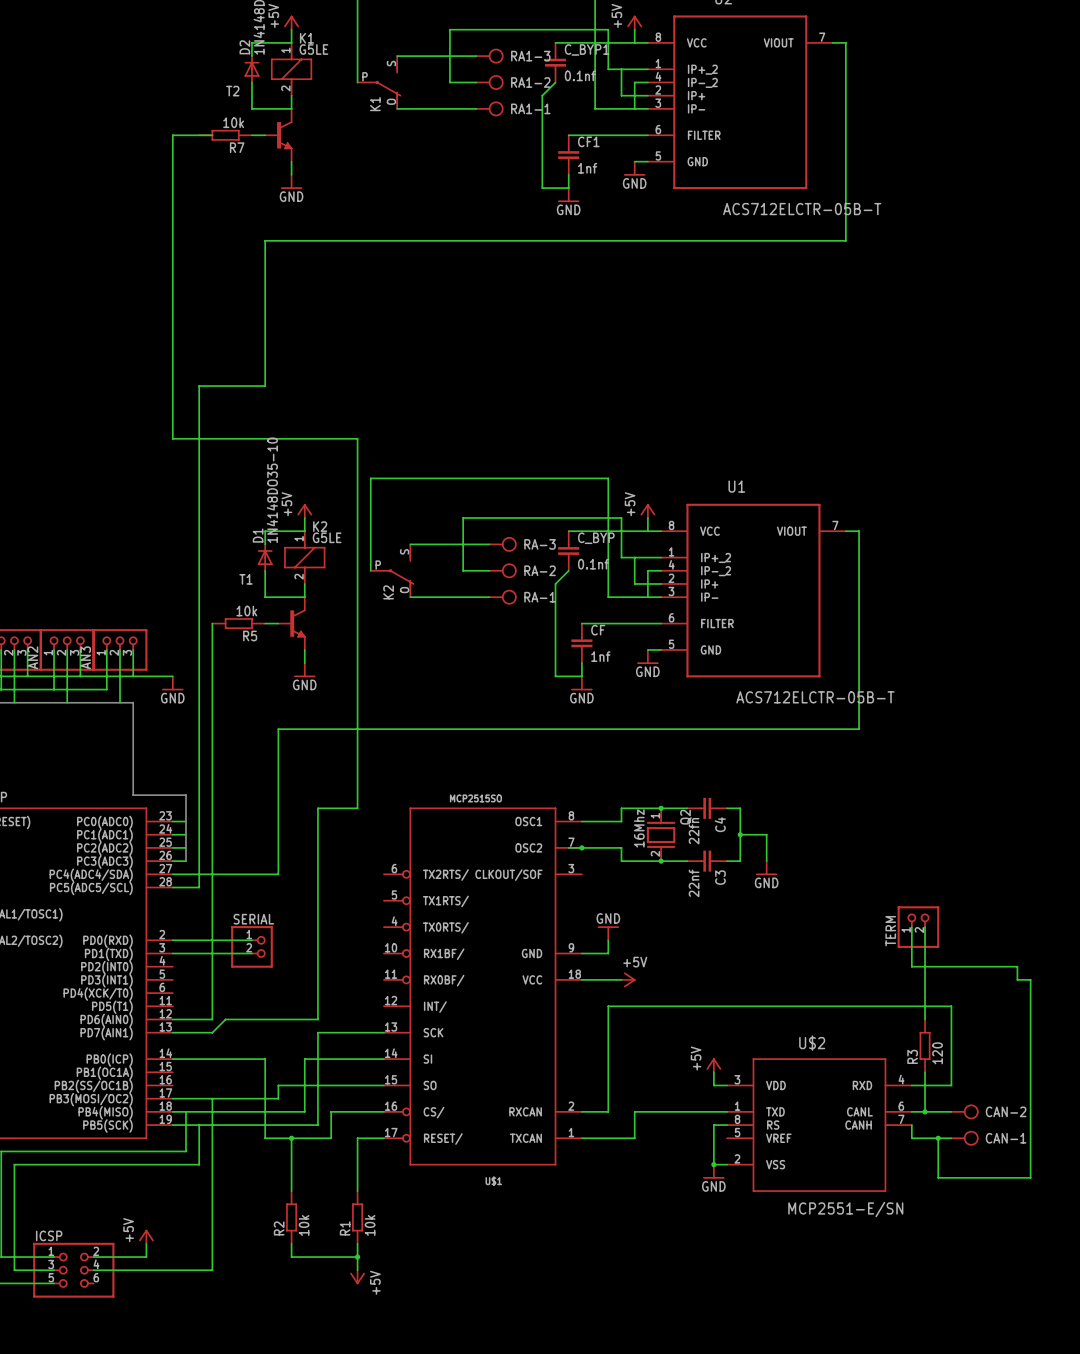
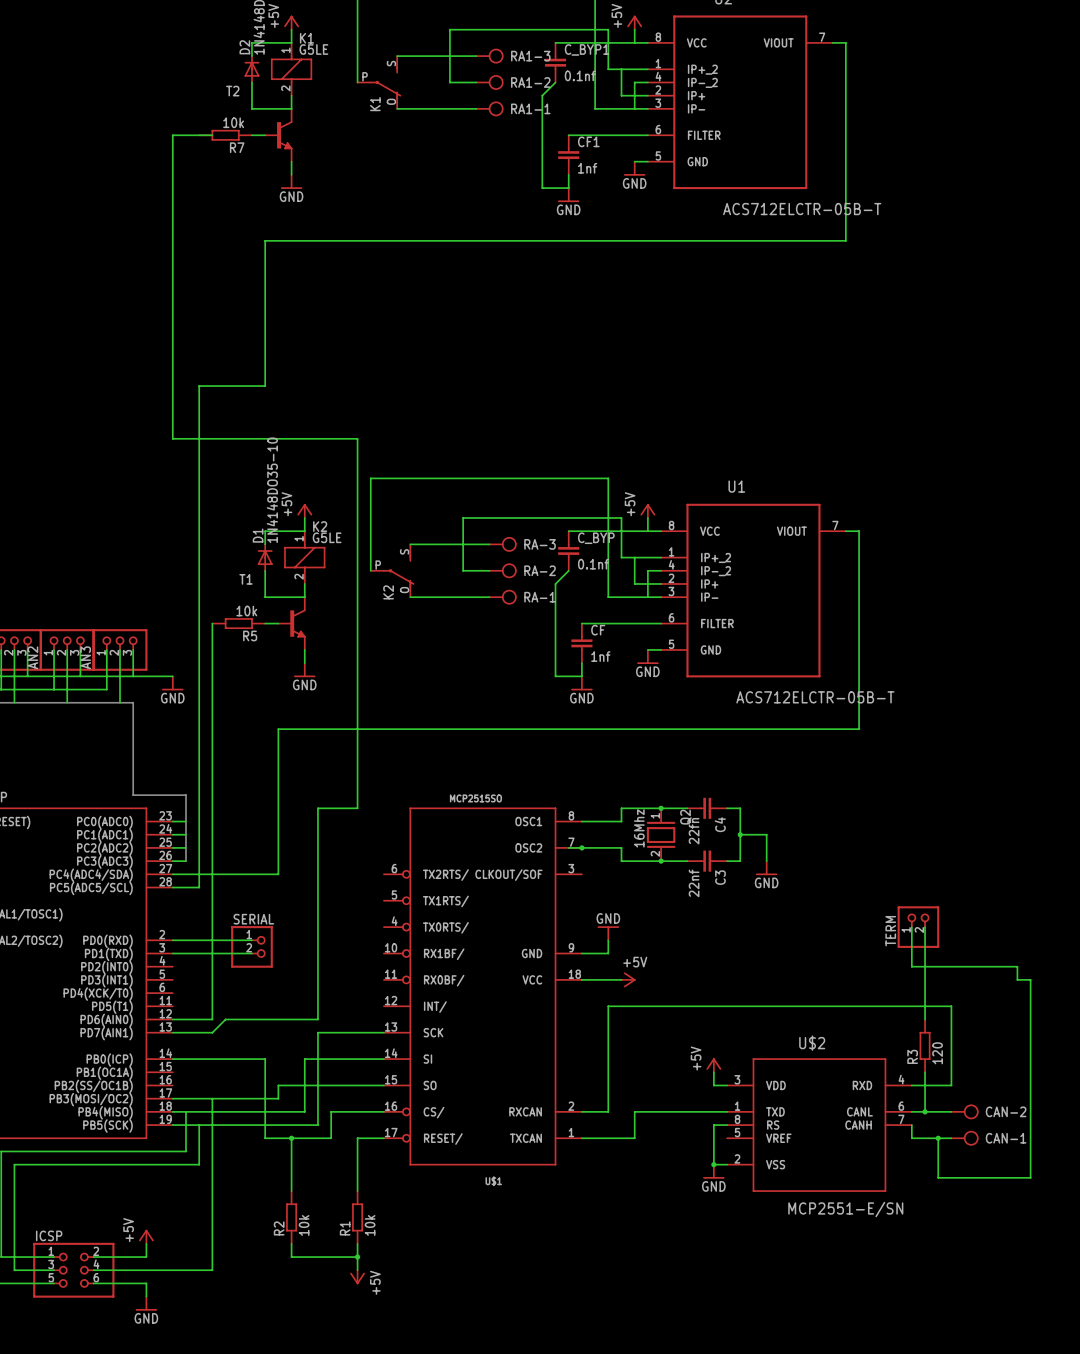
wire: none -> (93, 1283) (146, 1283) (146, 1296)
power symbol: none -> GND (146, 1303)

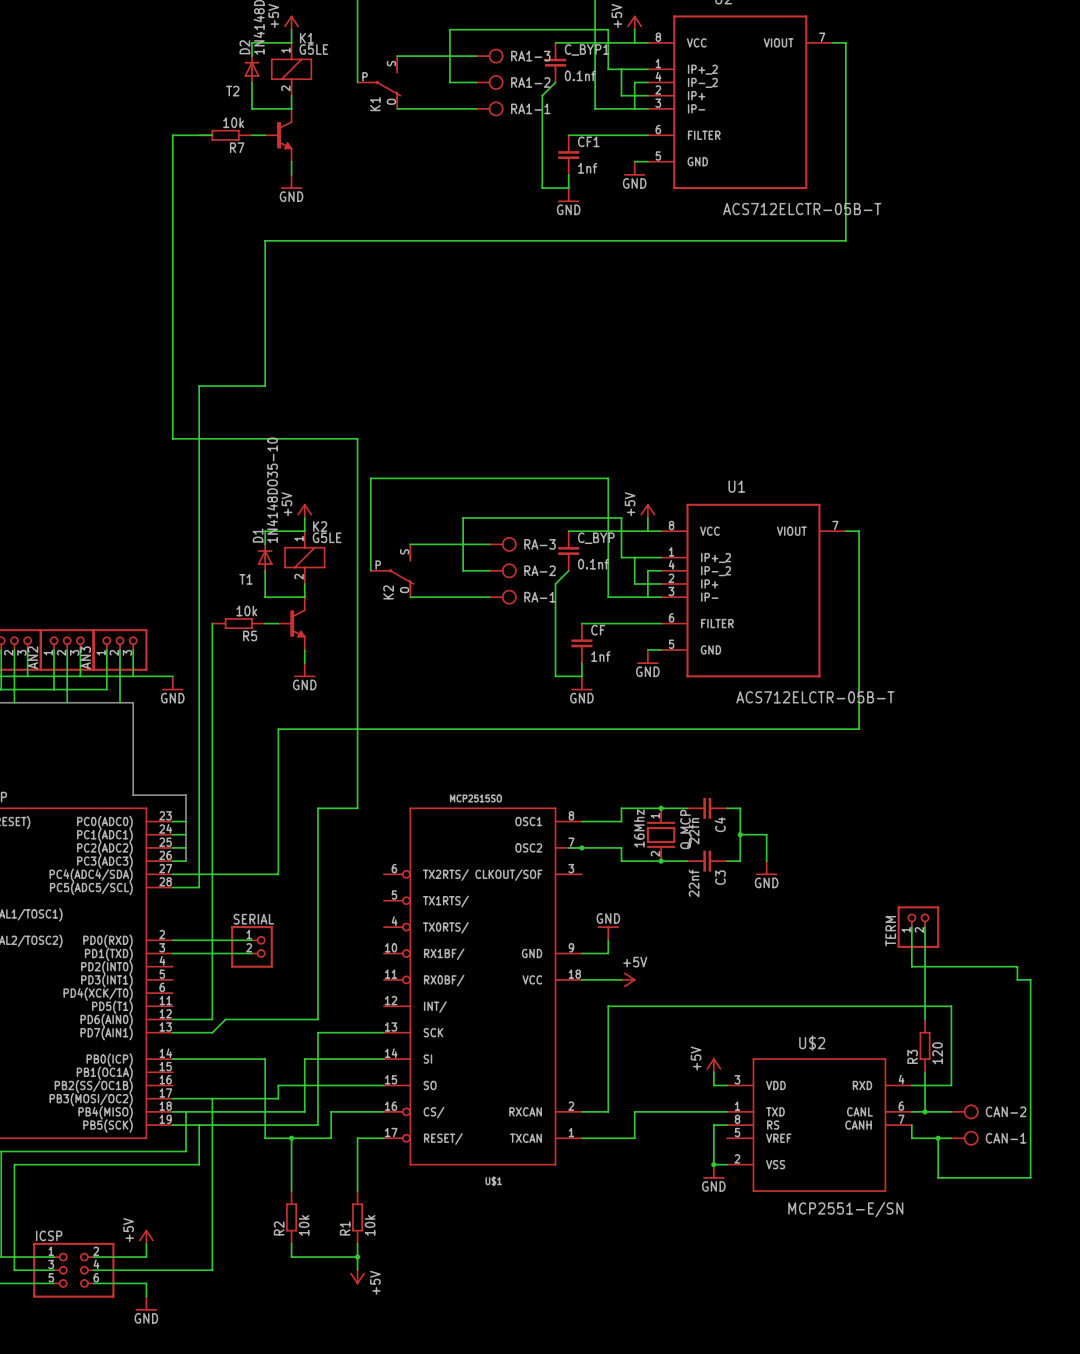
Q2 name: Q2 (685, 817) -> Q_MCP (685, 829)

